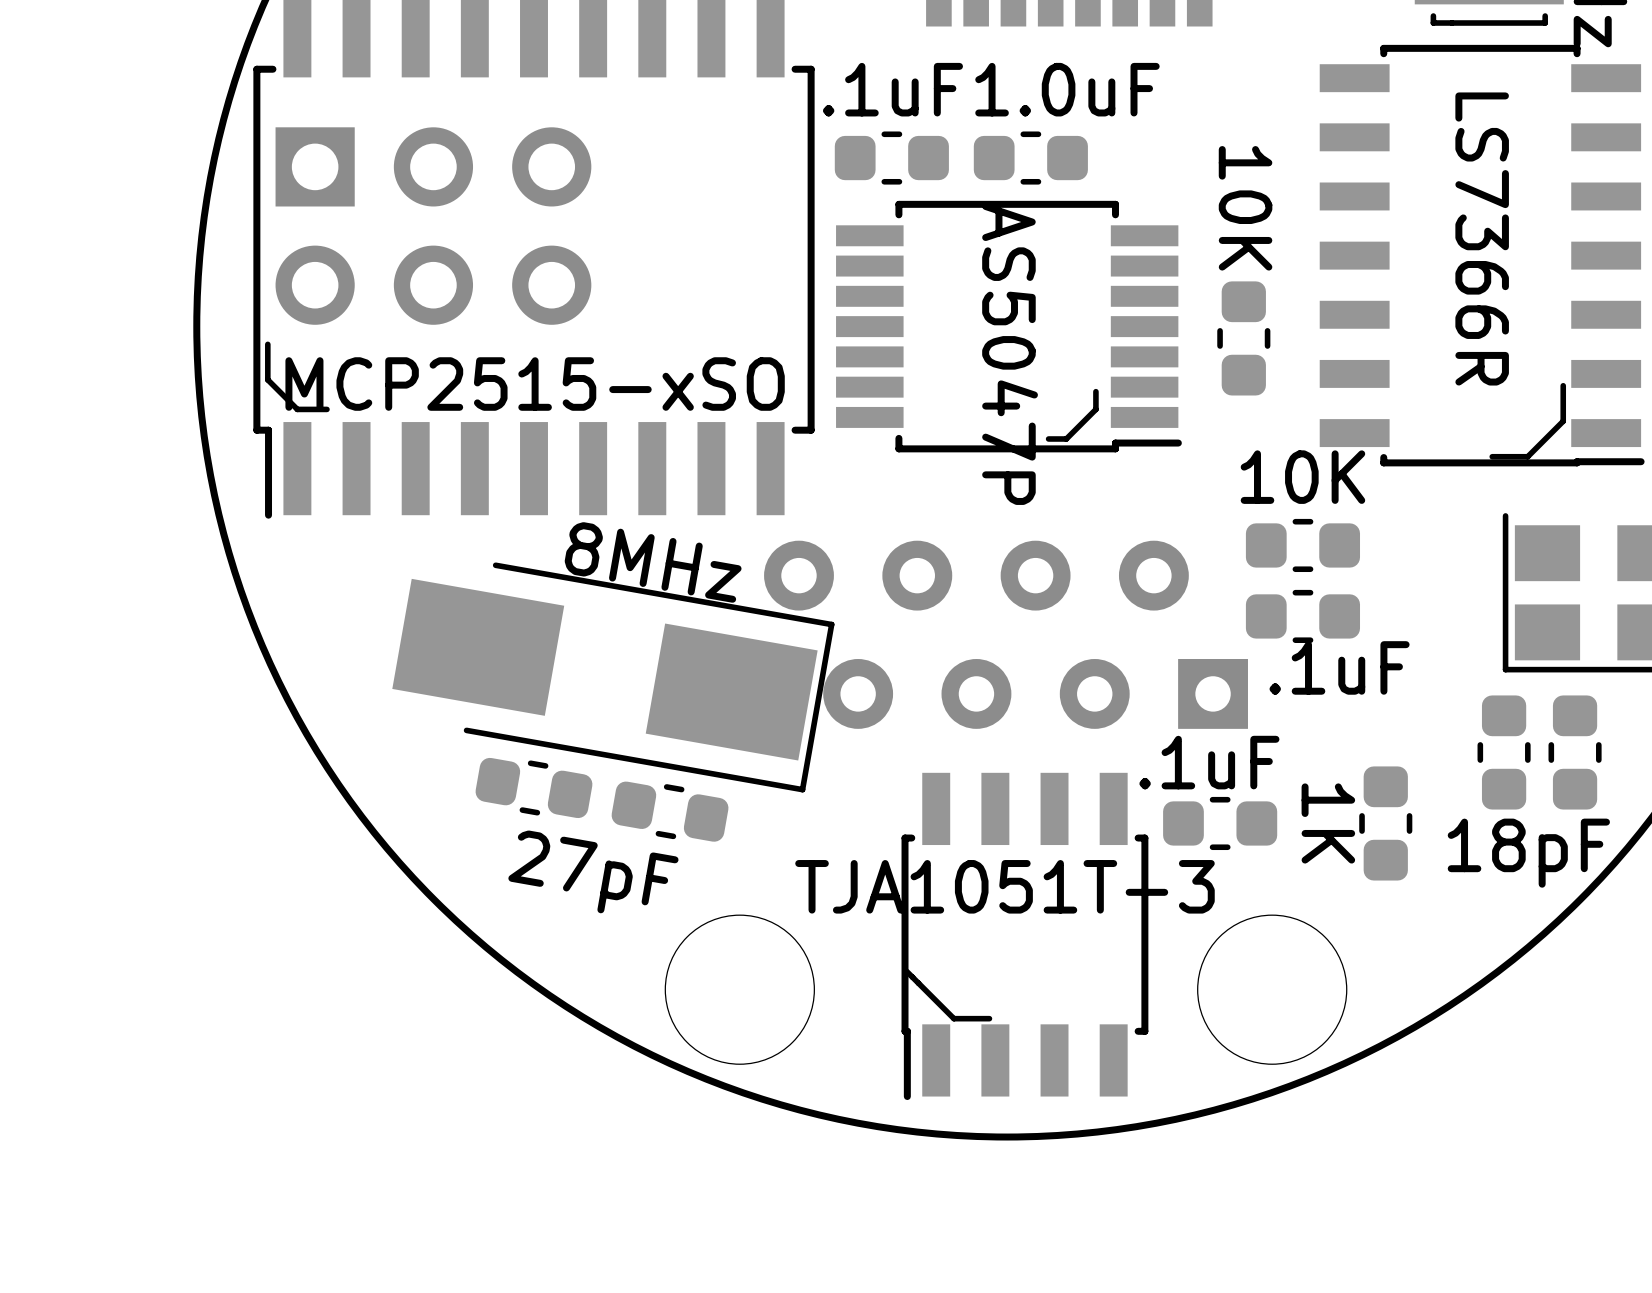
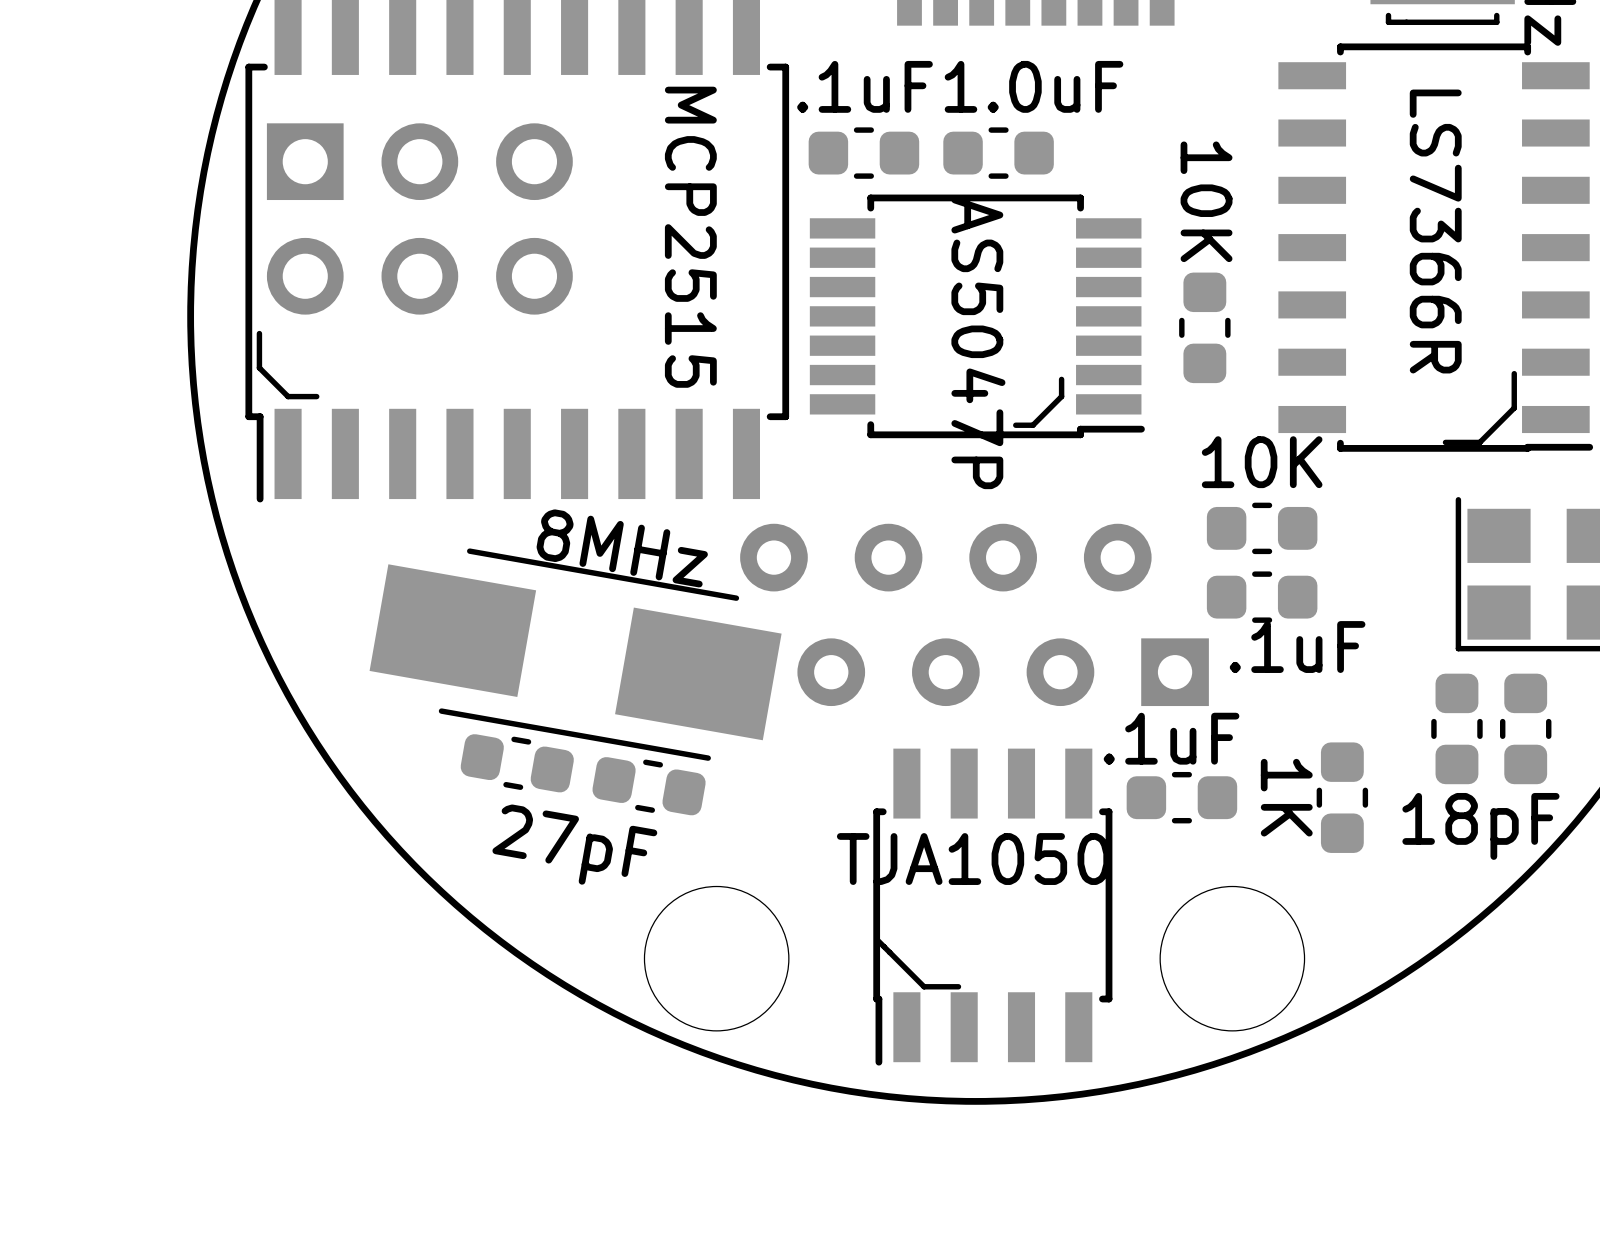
part value: MCP2515-xSO (535, 384) -> MCP2515 (690, 237)
part footprint: [392, 562, 835, 793] -> [369, 548, 782, 761]
part value: TJA1051T-3 (1004, 886) -> TJA1050 (973, 859)

